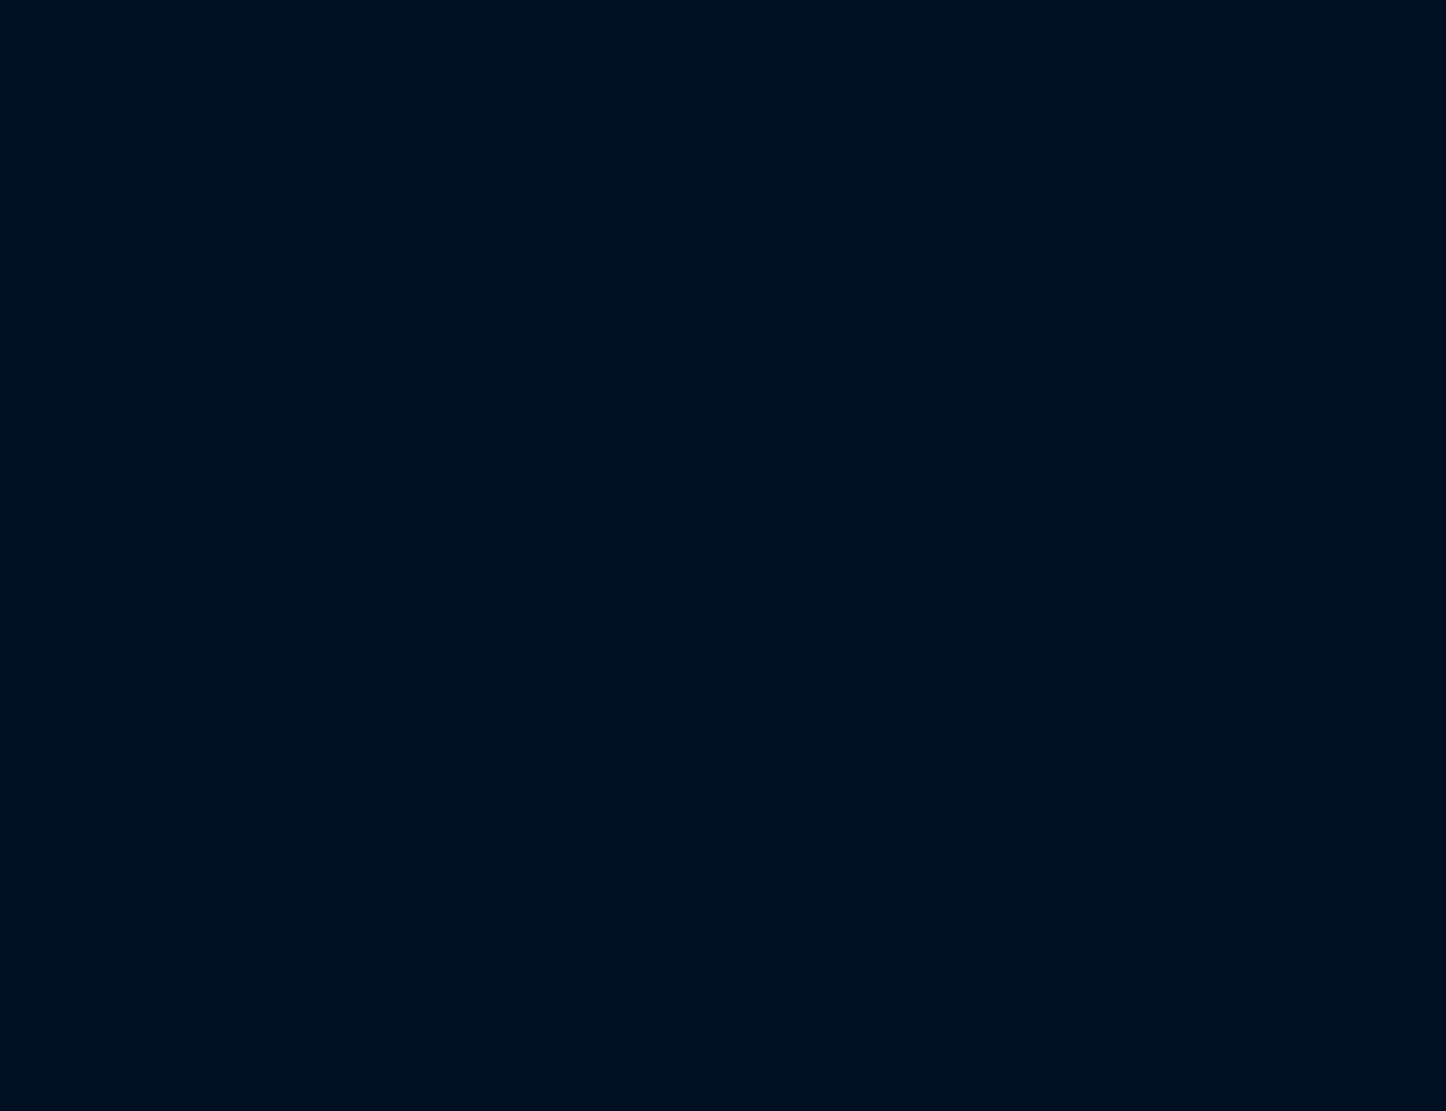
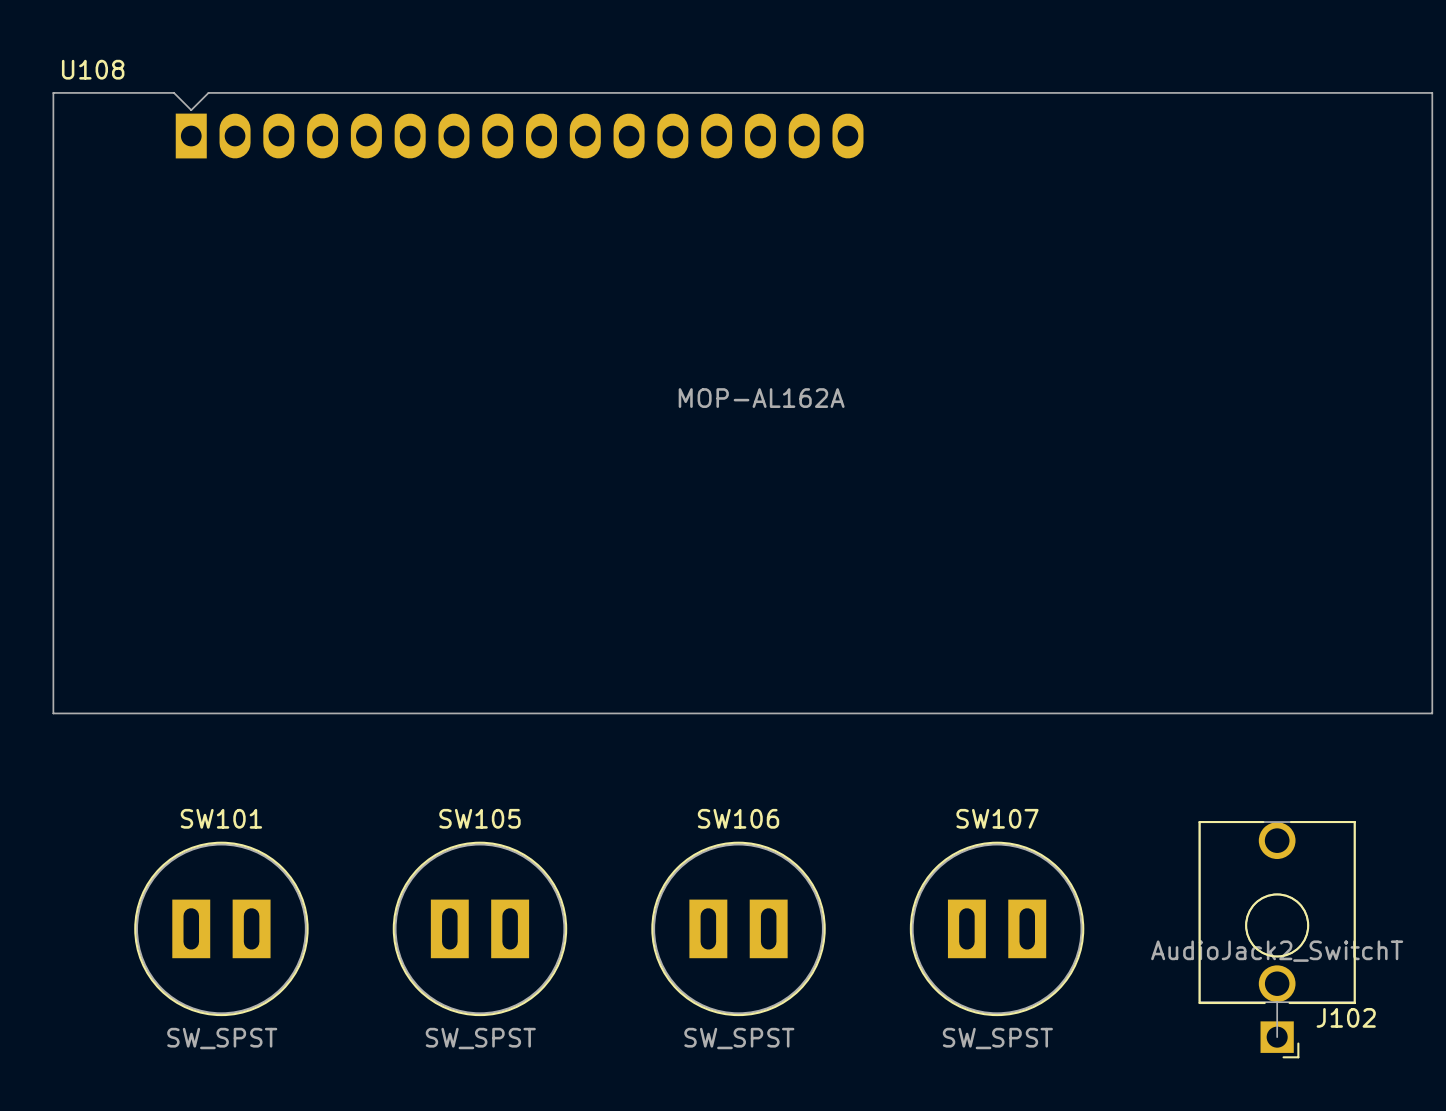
U108: none -> MOP-AL162A (742, 403)
SW101: none -> SW_SPST (221, 928)
SW105: none -> SW_SPST (479, 928)
SW106: none -> SW_SPST (738, 928)
SW107: none -> SW_SPST (997, 928)
J102: none -> AudioJack2_SwitchT (1277, 939)

